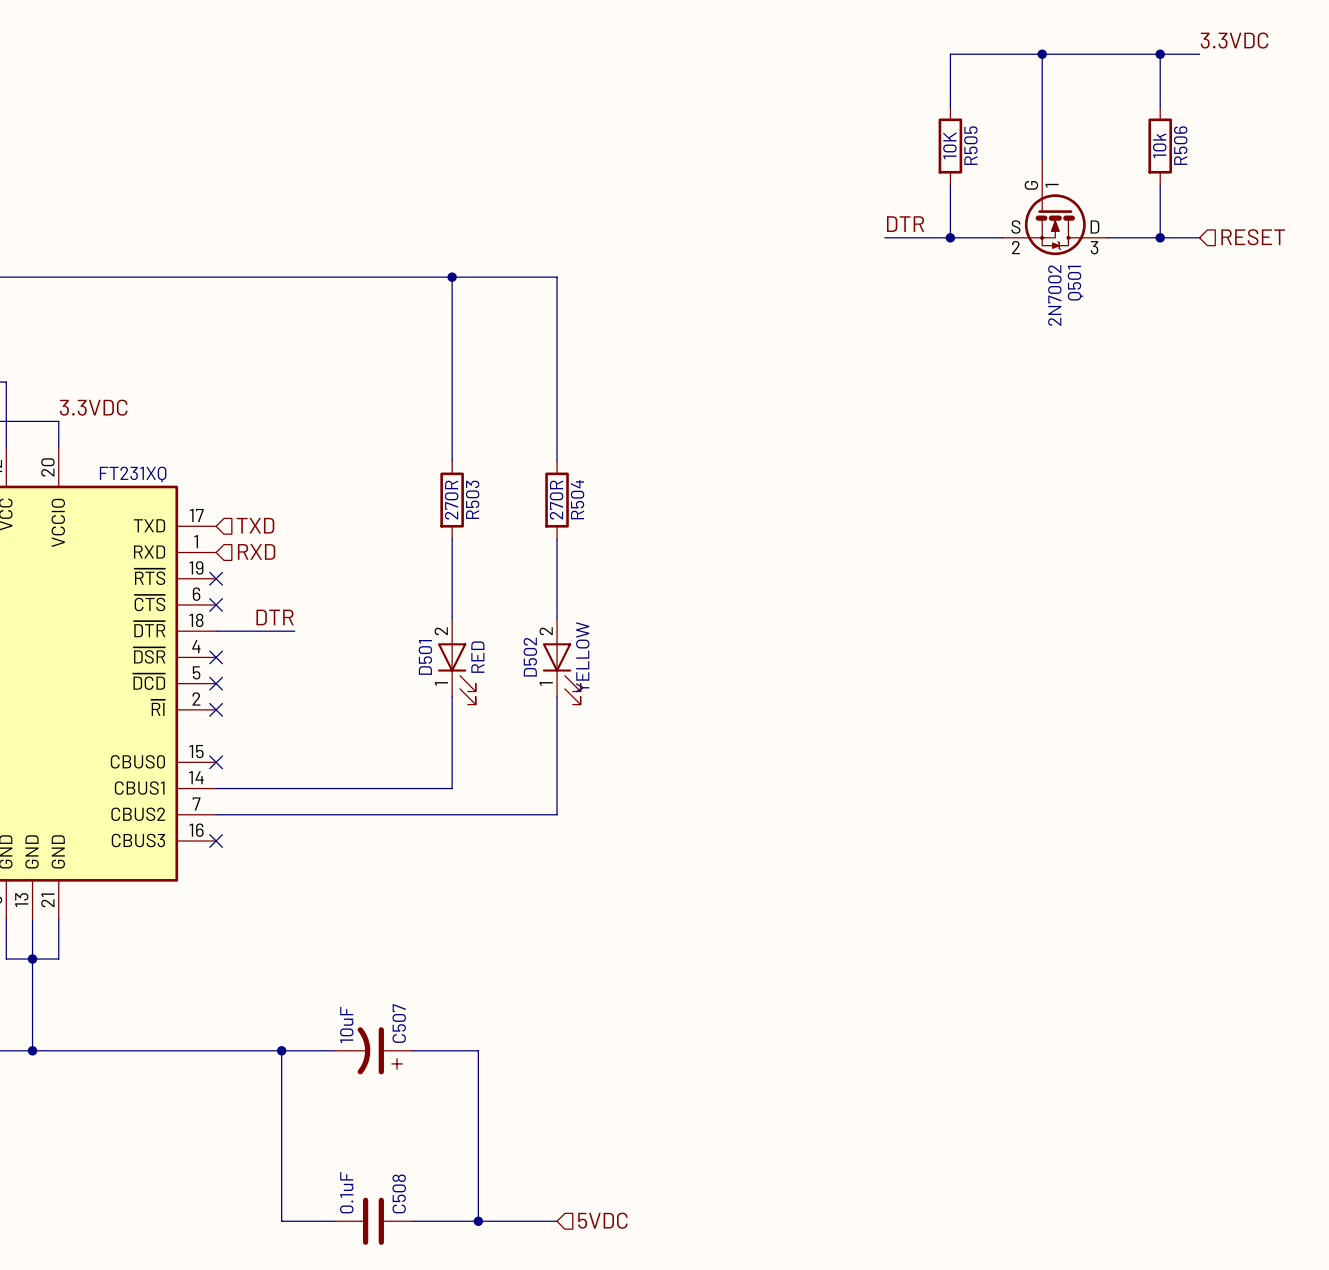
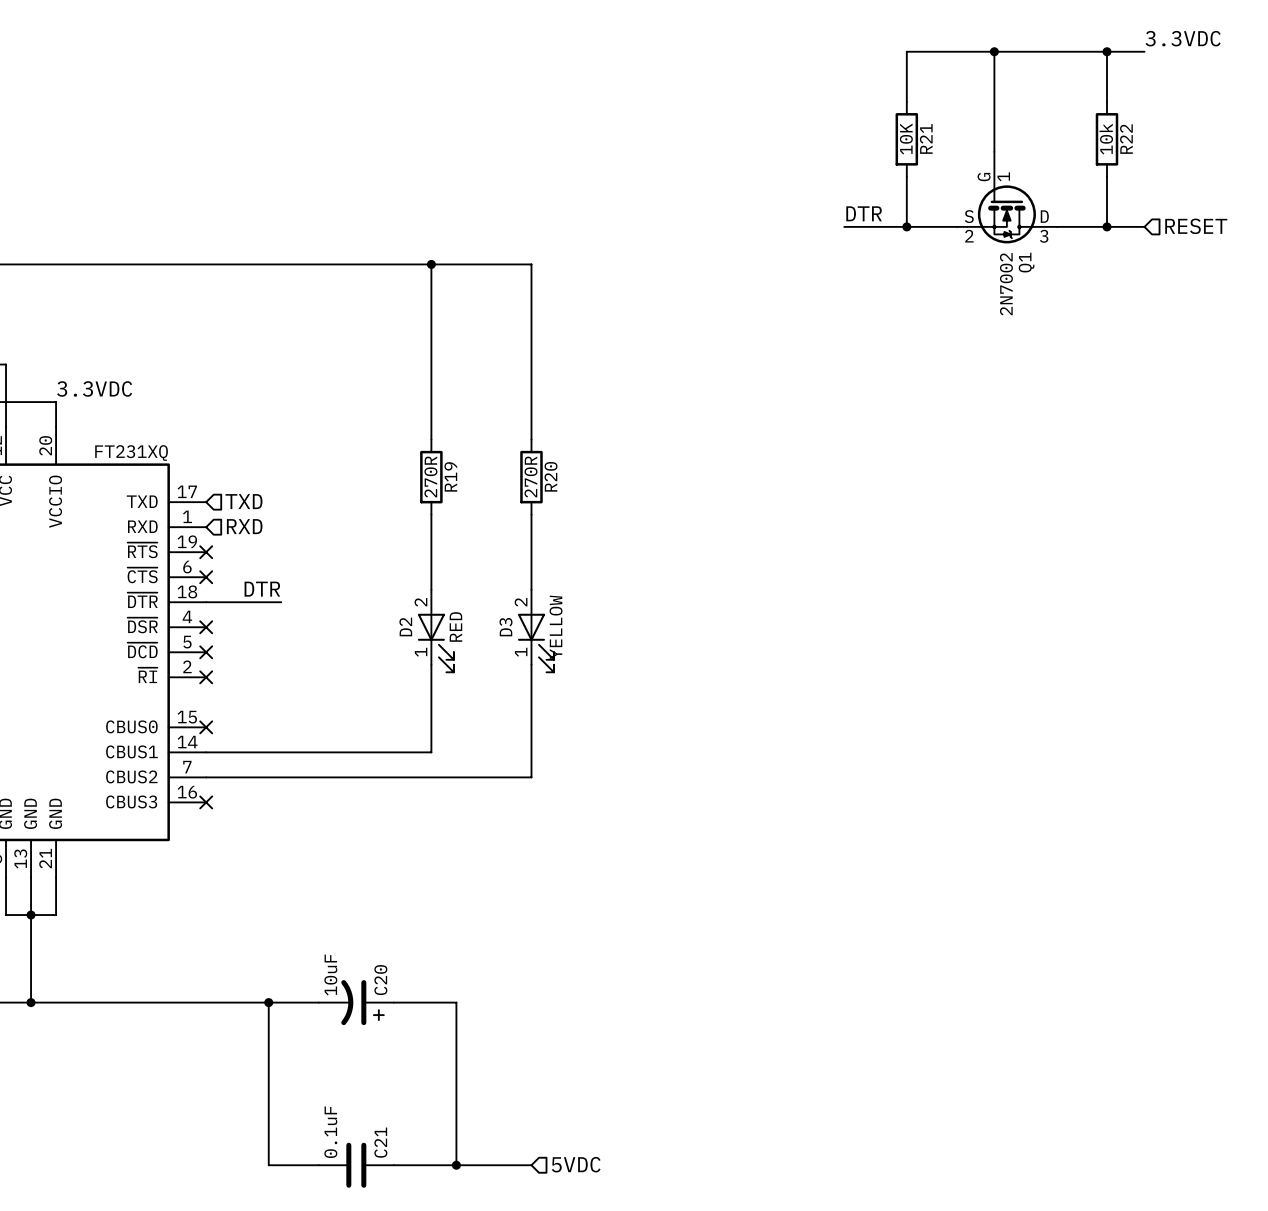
R505 name: R505 (970, 145) -> R21 (926, 138)
R506 name: R506 (1180, 145) -> R22 (1126, 139)
Q501 name: Q501 (1075, 283) -> Q1 (1026, 262)
R503 name: R503 (472, 499) -> R19 (450, 476)
R504 name: R504 (577, 499) -> R20 (551, 476)
D501 name: D501 (425, 657) -> D2 (405, 626)
D502 name: D502 (530, 657) -> D3 (505, 627)
C507 name: C507 (399, 1023) -> C20 (380, 980)
C508 name: C508 (399, 1193) -> C21 (380, 1142)

